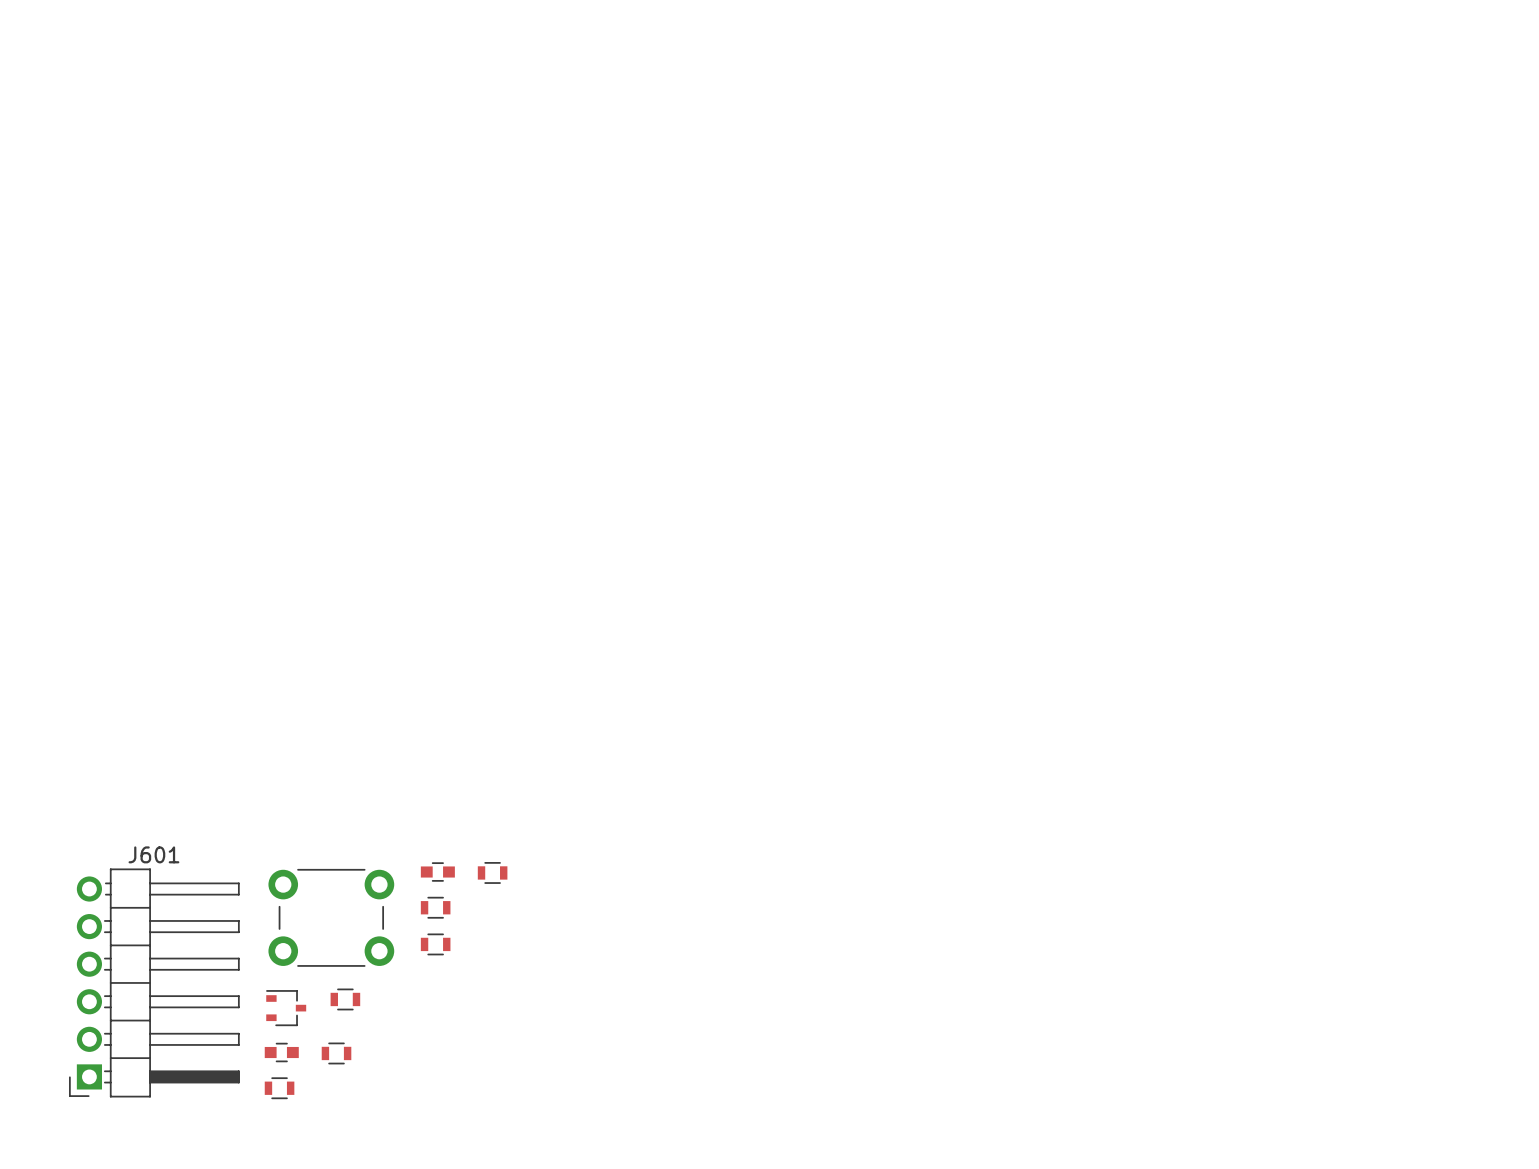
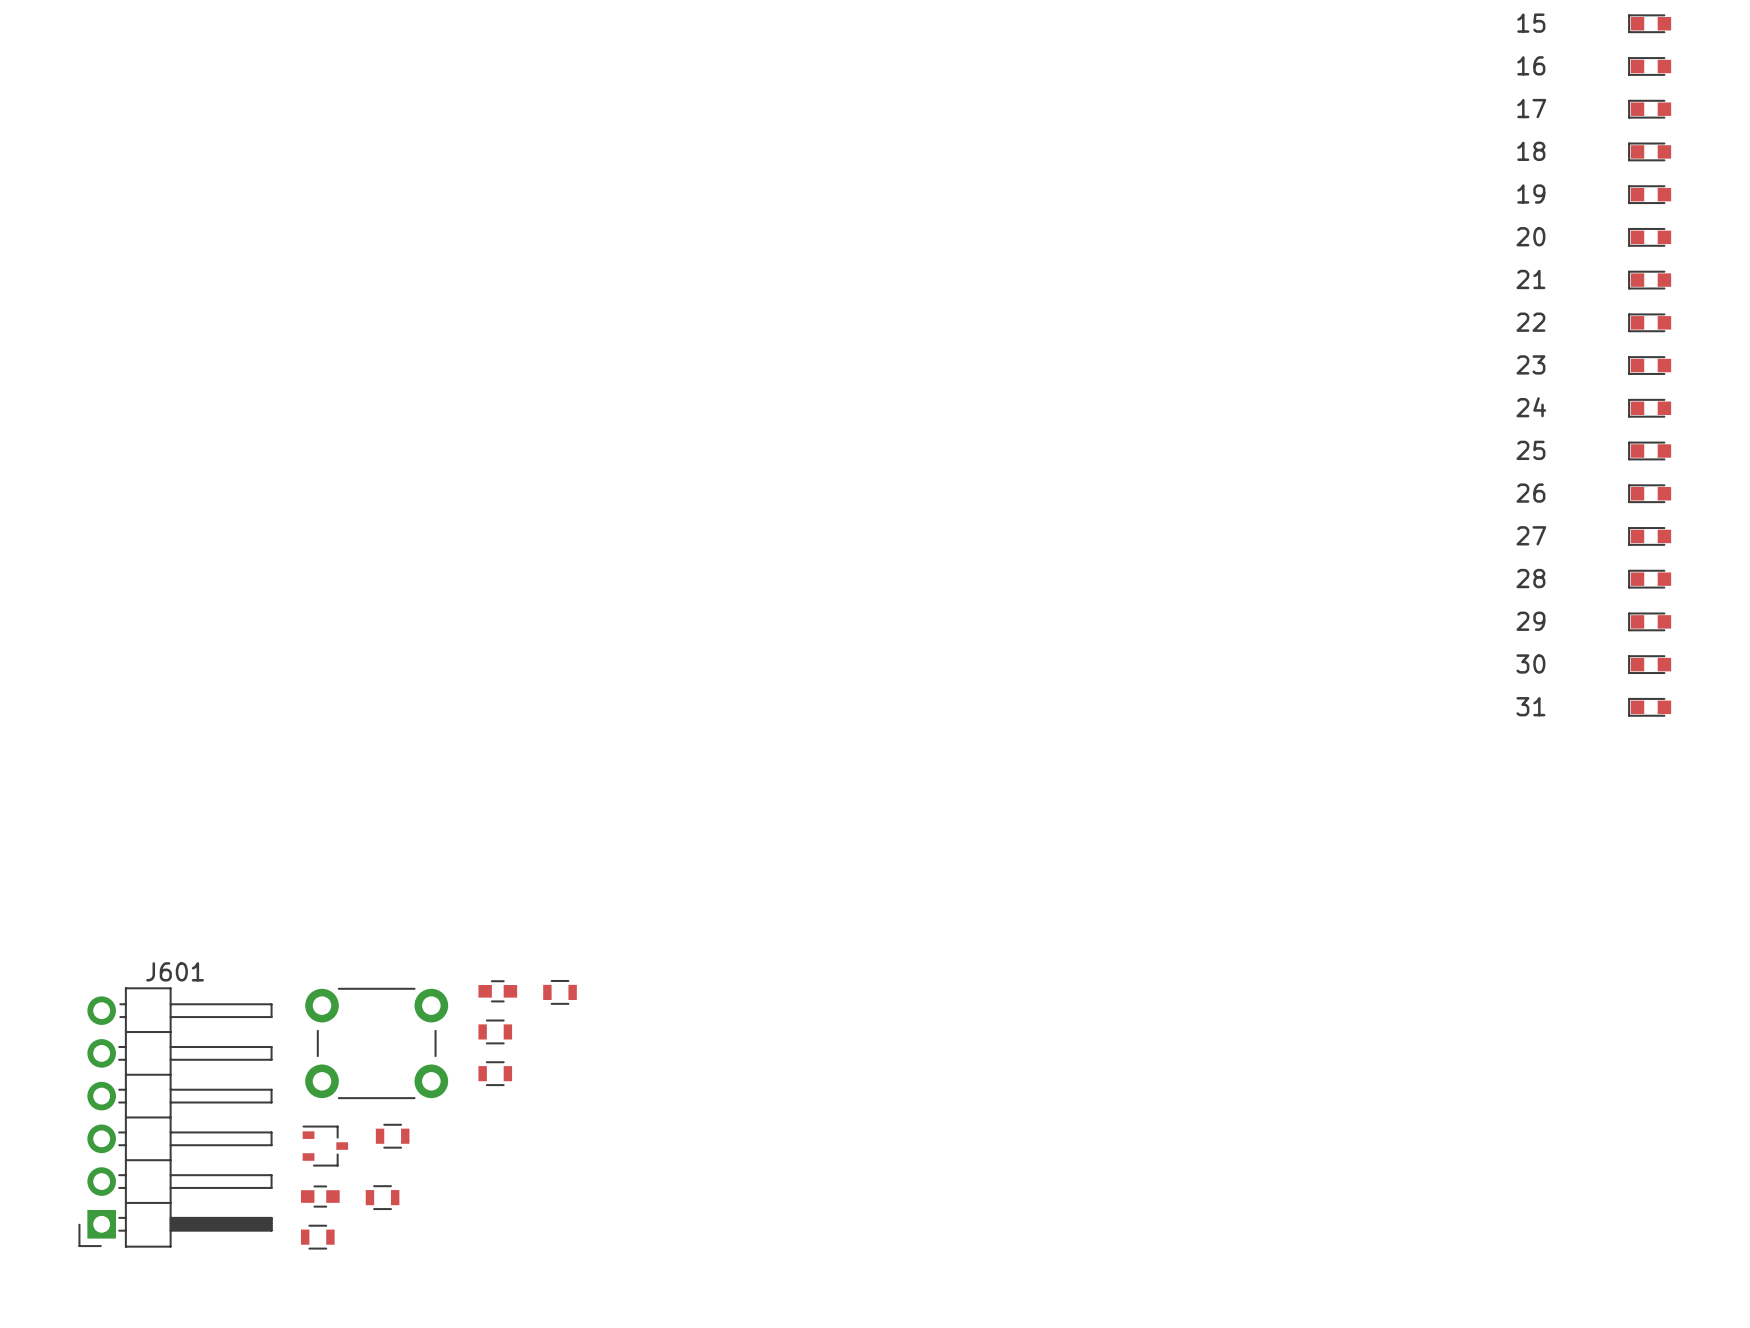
text: none -> 15 (1531, 23)
part: none -> (1649, 23)
text: none -> 16 (1531, 65)
part: none -> (1649, 66)
text: none -> 17 (1531, 108)
part: none -> (1649, 109)
text: none -> 18 (1531, 151)
part: none -> (1649, 151)
text: none -> 19 (1531, 194)
part: none -> (1649, 194)
text: none -> 20 (1530, 236)
part: none -> (1649, 237)
text: none -> 21 (1530, 279)
part: none -> (1649, 280)
text: none -> 22 (1530, 322)
part: none -> (1649, 322)
text: none -> 23 (1530, 364)
part: none -> (1649, 365)
text: none -> 24 (1531, 407)
part: none -> (1649, 408)
text: none -> 25 (1530, 450)
part: none -> (1649, 450)
text: none -> 26 (1530, 493)
part: none -> (1649, 493)
text: none -> 27 (1531, 535)
part: none -> (1649, 536)
text: none -> 28 (1530, 578)
part: none -> (1649, 579)
text: none -> 29 (1530, 621)
part: none -> (1649, 621)
text: none -> 30 (1530, 663)
part: none -> (1649, 664)
text: none -> 31 (1530, 706)
part: none -> (1649, 707)

